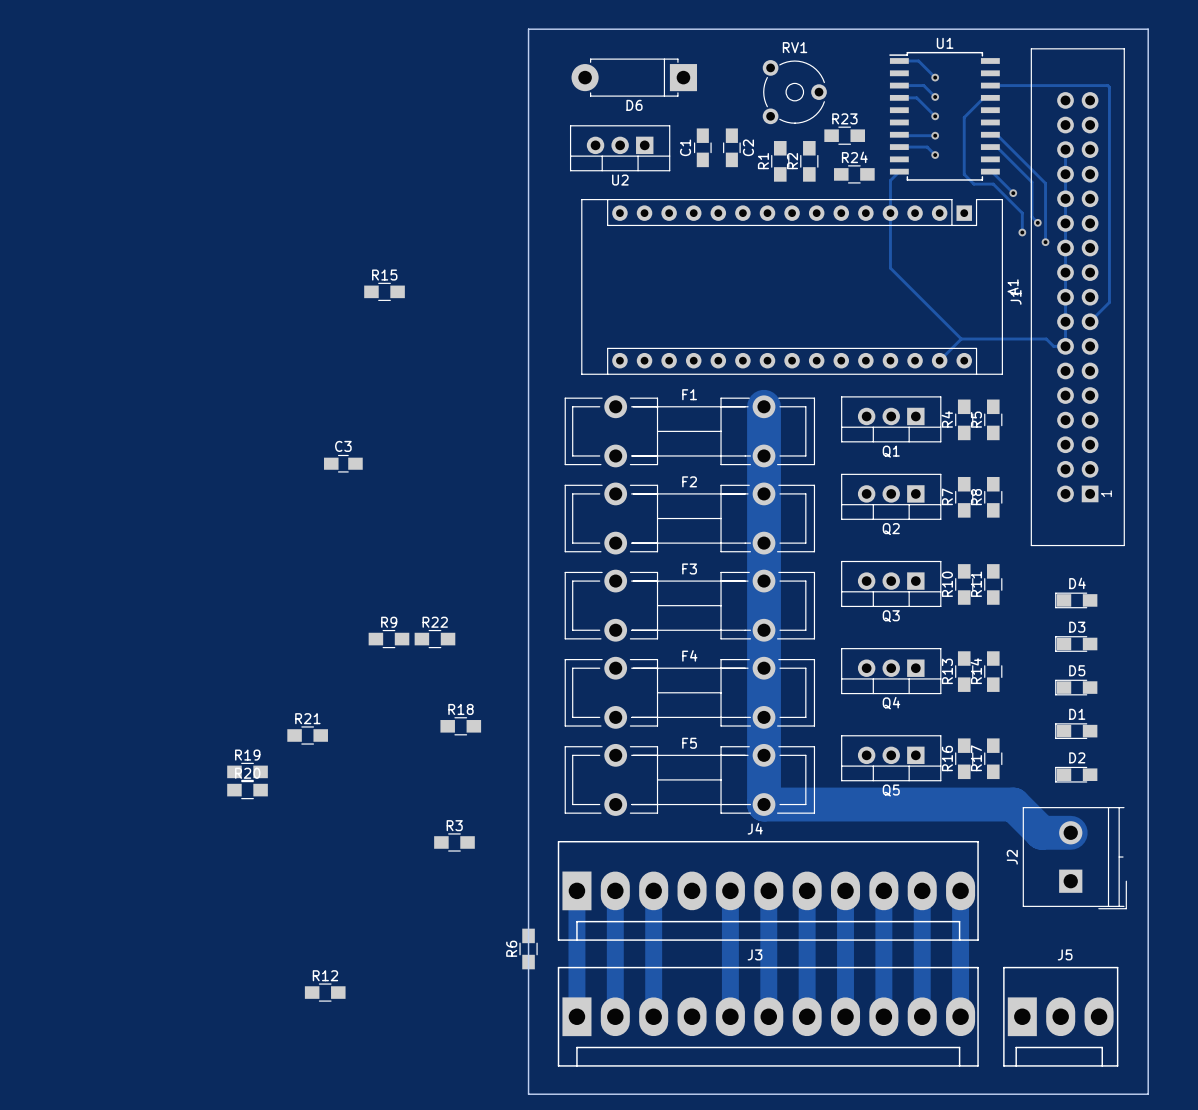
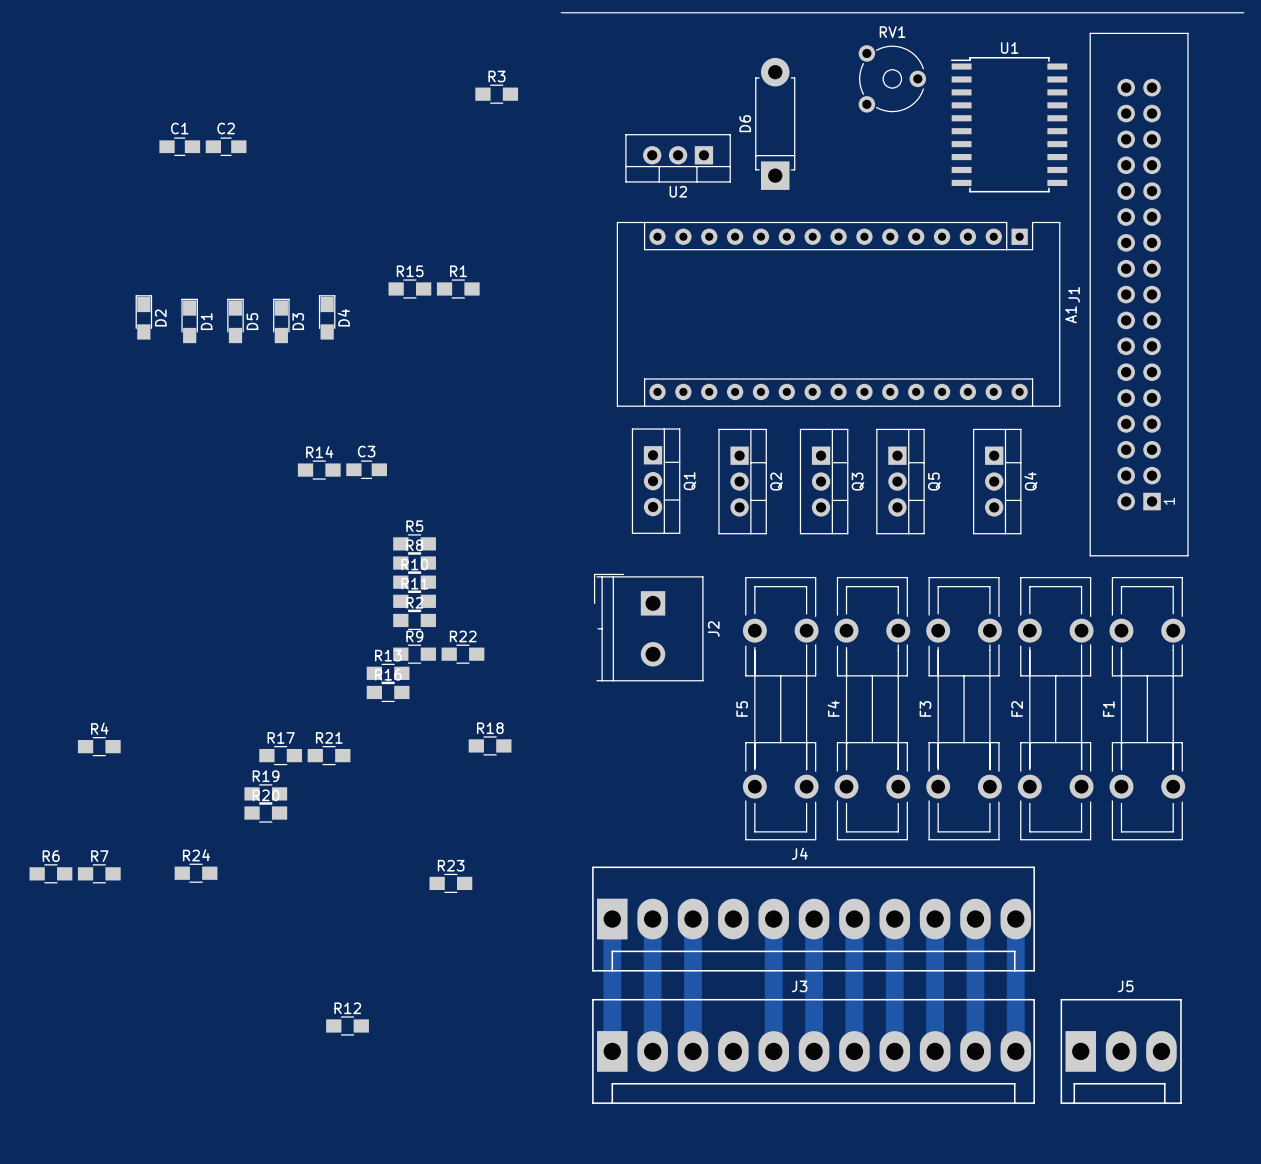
board edge: (528, 29) (528, 1094) (1148, 1094) (1148, 29) -> (1243, 12) (1213, 12)
track: (899, 60) (918, 60) (935, 77) -> none
D6 rotation: 0° (634, 77) -> 90° clockwise (775, 123)
D6 position: (634, 77) -> (775, 123)
via: (935, 77) -> none
track: (899, 85) (923, 85) (935, 96) -> none
track: (990, 85) (1107, 85) (1109, 87) (1109, 302) (1090, 321) -> none
RV1 position: (794, 92) -> (892, 78)
via: (935, 96) -> none
track: (899, 97) (916, 97) (935, 116) -> none
track: (990, 97) (983, 97) (964, 117) (964, 174) (973, 184) (993, 184) (1022, 213) (1022, 232) -> none
via: (935, 116) -> none
U1 position: (944, 116) -> (1009, 124)
track: (899, 134) (935, 135) -> none
track: (990, 134) (996, 134) (1045, 183) (1045, 242) -> none
R23 position: (844, 135) -> (450, 883)
via: (935, 135) -> none
C1 rotation: 0° (702, 147) -> 90° clockwise (179, 146)
C1 position: (702, 147) -> (179, 146)
C2 rotation: 0° (731, 147) -> 90° clockwise (226, 146)
C2 position: (731, 147) -> (226, 146)
C2 name position: C2 (748, 147) -> C2 (226, 128)
track: (899, 147) (927, 147) (935, 155) -> none
track: (990, 147) (996, 147) (1032, 182) (1032, 217) (1037, 222) -> none
U2 position: (620, 148) -> (678, 158)
track: (1065, 149) (1065, 346) (1053, 346) (1046, 339) (961, 339) -> none
via: (935, 155) -> none
R1 rotation: 0° (780, 161) -> 90° clockwise (458, 288)
R1 position: (780, 161) -> (458, 288)
R2 rotation: 0° (809, 161) -> 90° clockwise (414, 620)
R2 position: (809, 161) -> (414, 620)
track: (899, 171) (890, 180) (890, 268) (961, 339) -> none
track: (990, 171) (1013, 193) -> none
R24 position: (854, 174) -> (196, 873)
via: (1013, 193) -> none
via: (1037, 222) -> none
via: (1022, 232) -> none
via: (1045, 242) -> none
A1 position: (792, 286) -> (838, 314)
track: (961, 339) (939, 360) -> none
track: (764, 406) (764, 804) (1013, 804) (1041, 832) (1070, 832) -> none
Q1 rotation: 0° (891, 419) -> 90° counterclockwise (656, 481)
Q1 position: (891, 419) -> (656, 481)
R4 rotation: 0° (964, 419) -> 90° clockwise (99, 746)
R4 position: (964, 419) -> (99, 746)
R5 rotation: 0° (993, 419) -> 90° clockwise (414, 543)
R5 position: (993, 419) -> (414, 543)
F1 rotation: 0° (689, 431) -> 90° counterclockwise (1147, 708)
F1 position: (689, 431) -> (1147, 708)
Q2 rotation: 0° (891, 496) -> 90° counterclockwise (742, 481)
Q2 position: (891, 496) -> (742, 481)
R7 rotation: 0° (964, 497) -> 90° clockwise (99, 873)
R7 position: (964, 497) -> (99, 873)
R8 rotation: 0° (993, 497) -> 90° clockwise (414, 563)
R8 position: (993, 497) -> (414, 563)
F2 rotation: 0° (689, 518) -> 90° counterclockwise (1055, 708)
F2 position: (689, 518) -> (1055, 708)
Q3 rotation: 0° (891, 583) -> 90° counterclockwise (824, 481)
Q3 position: (891, 583) -> (824, 481)
R10 rotation: 0° (964, 584) -> 90° clockwise (414, 582)
R10 position: (964, 584) -> (414, 582)
R11 rotation: 0° (993, 584) -> 90° clockwise (414, 601)
R11 position: (993, 584) -> (414, 601)
D4 rotation: 0° (1076, 600) -> 90° clockwise (327, 317)
D4 position: (1076, 600) -> (327, 317)
F3 rotation: 0° (689, 605) -> 90° counterclockwise (964, 708)
F3 position: (689, 605) -> (964, 708)
D3 rotation: 0° (1076, 644) -> 90° clockwise (281, 320)
D3 position: (1076, 644) -> (281, 320)
Q4 rotation: 0° (891, 671) -> 90° counterclockwise (997, 481)
Q4 position: (891, 671) -> (997, 481)
R13 rotation: 0° (964, 671) -> 90° clockwise (388, 673)
R13 position: (964, 671) -> (388, 673)
R14 rotation: 0° (993, 671) -> 90° clockwise (319, 470)
R14 position: (993, 671) -> (319, 470)
D5 rotation: 0° (1076, 687) -> 90° clockwise (235, 320)
D5 position: (1076, 687) -> (235, 320)
F4 rotation: 0° (689, 692) -> 90° counterclockwise (872, 708)
D1 rotation: 0° (1076, 731) -> 90° clockwise (189, 320)
D1 position: (1076, 731) -> (189, 320)
Q5 rotation: 0° (891, 758) -> 90° counterclockwise (900, 481)
Q5 position: (891, 758) -> (900, 481)
R16 rotation: 0° (964, 758) -> 90° clockwise (388, 692)
R16 position: (964, 758) -> (388, 692)
R17 rotation: 0° (993, 758) -> 90° clockwise (280, 755)
R17 position: (993, 758) -> (280, 755)
D2 rotation: 0° (1076, 774) -> 90° clockwise (143, 317)
D2 position: (1076, 774) -> (143, 317)
F5 rotation: 0° (689, 779) -> 90° counterclockwise (780, 708)
R3 position: (454, 842) -> (496, 94)
J2 rotation: 0° (1074, 858) -> 180° (648, 627)
J2 position: (1074, 858) -> (648, 627)
R6 rotation: 0° (528, 948) -> 90° clockwise (50, 873)
R6 position: (528, 948) -> (50, 873)

